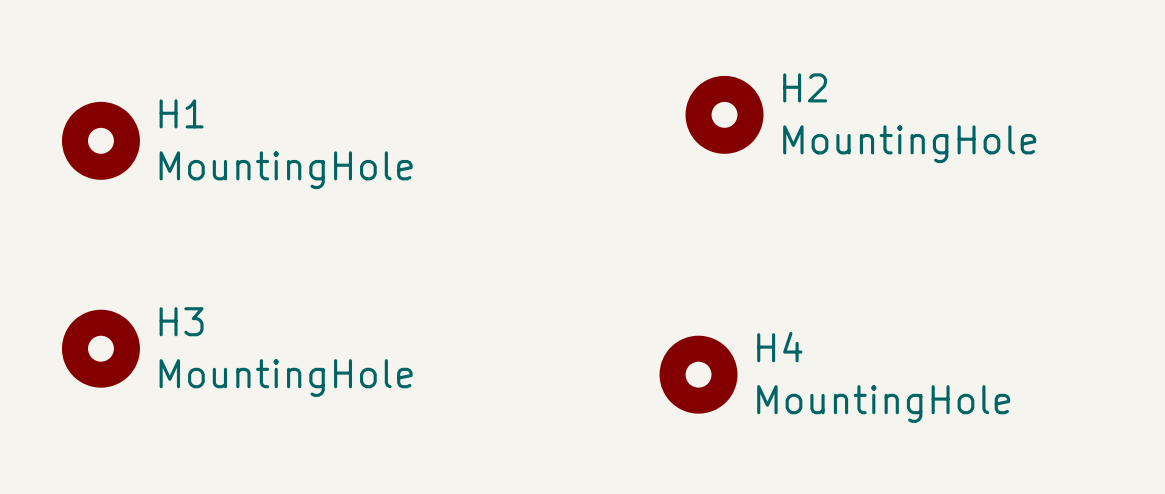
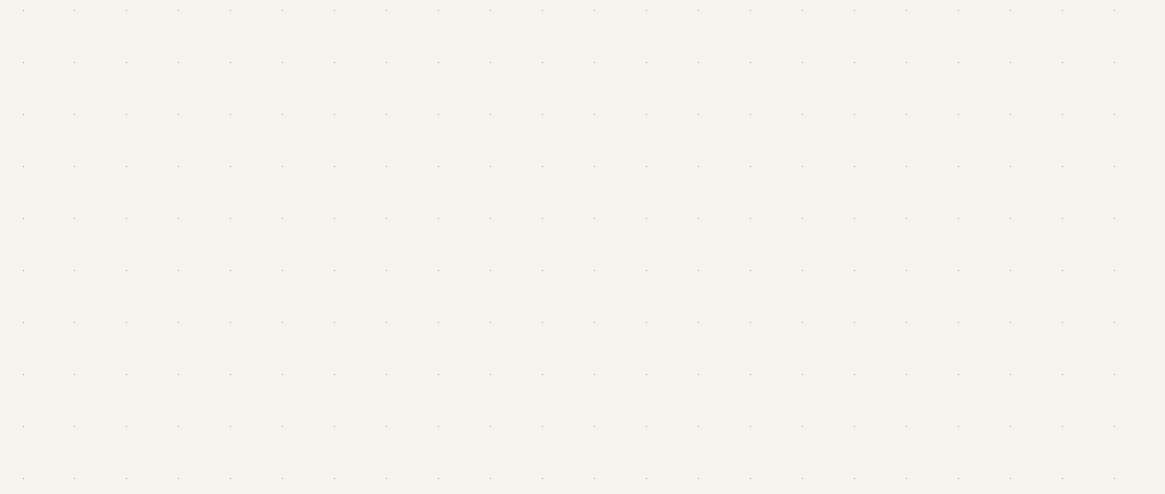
H2: MountingHole (724, 114) -> none
H1: MountingHole (100, 140) -> none
H3: MountingHole (100, 348) -> none
H4: MountingHole (698, 374) -> none

